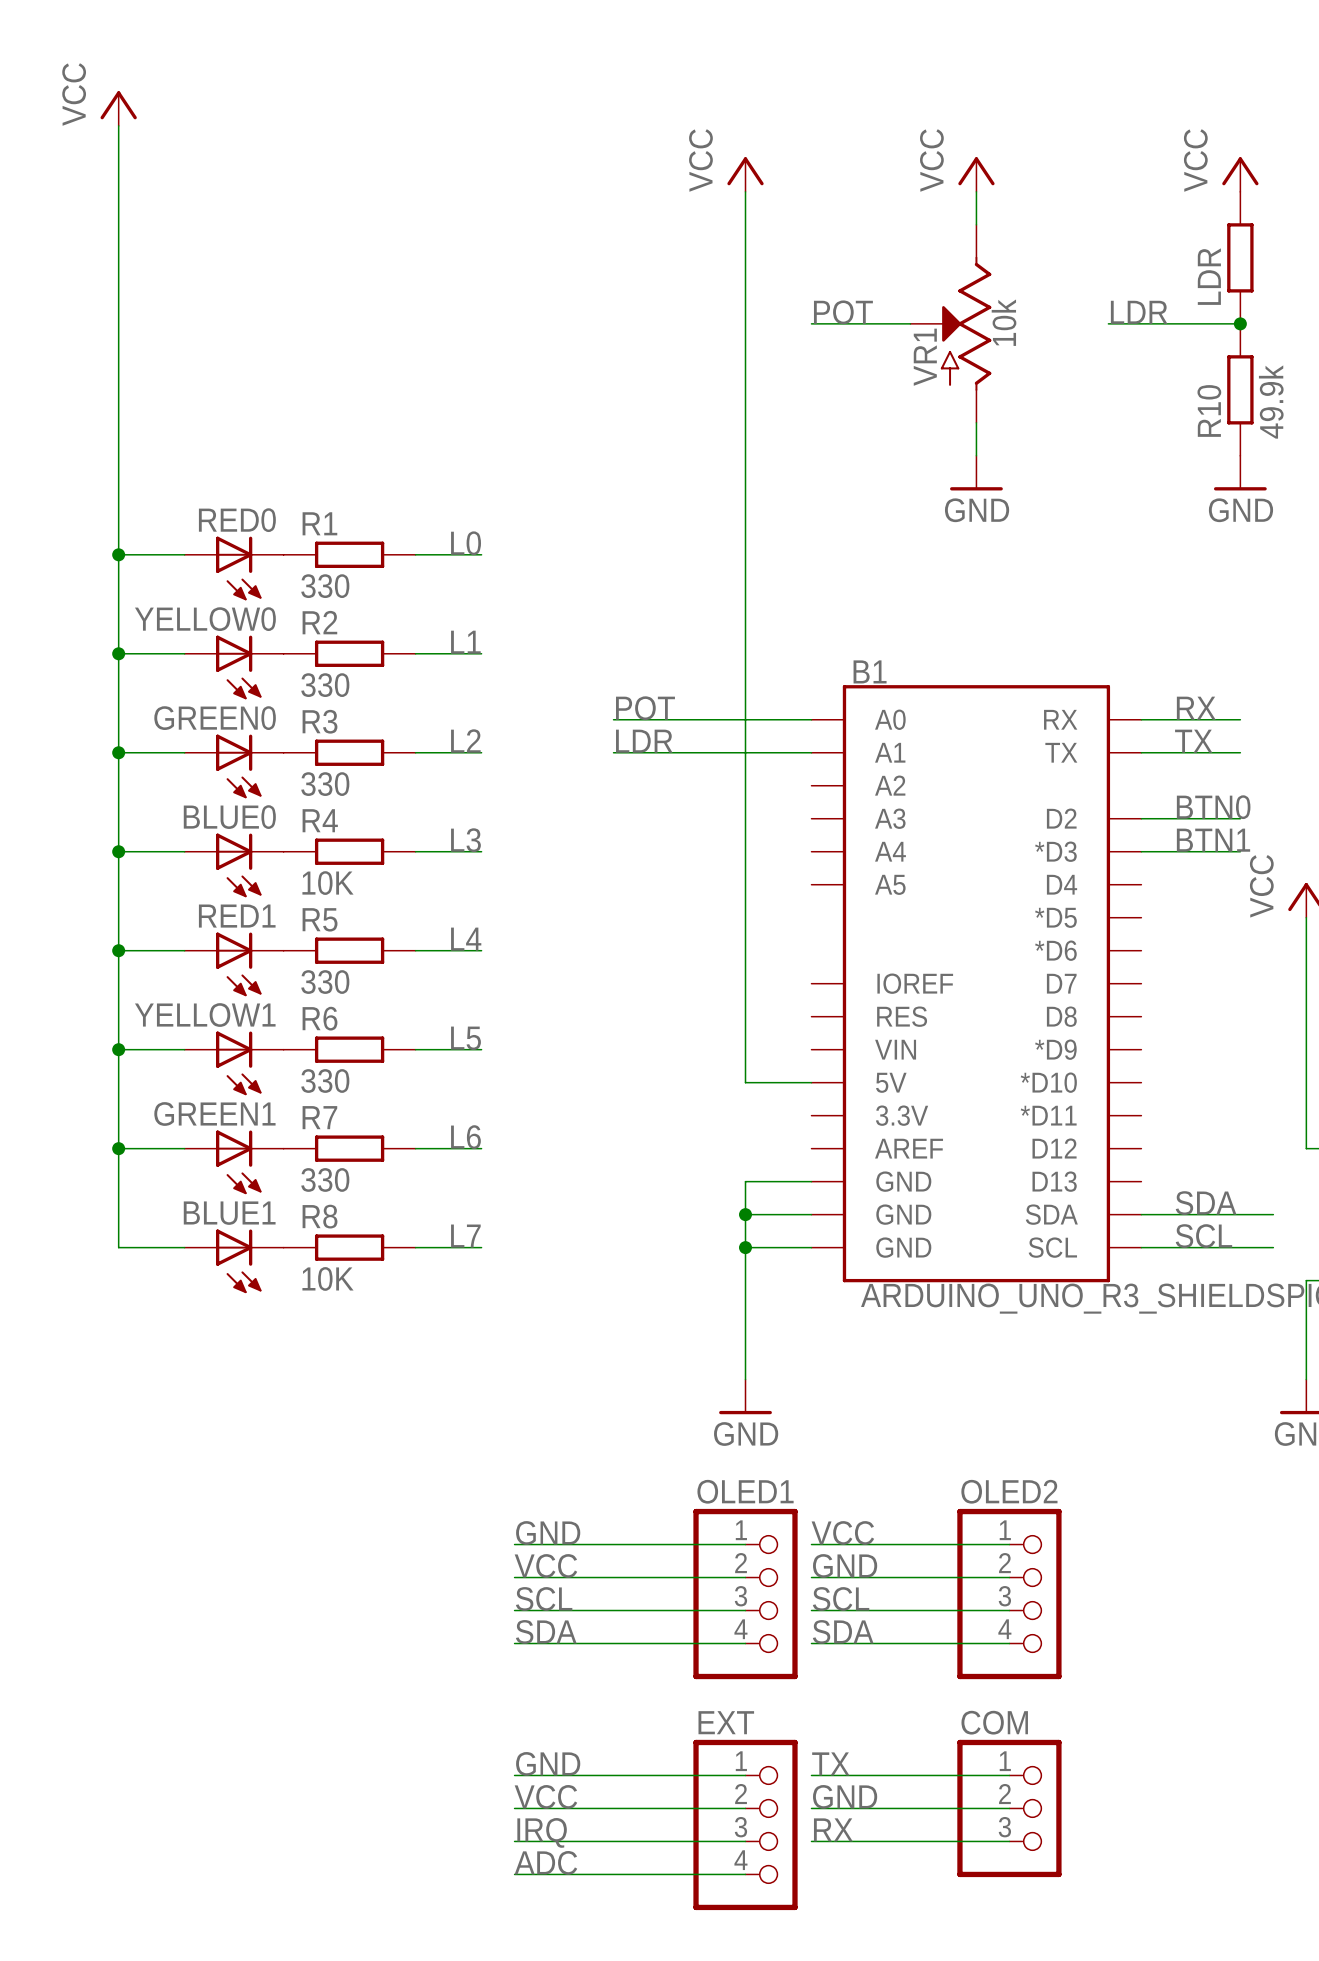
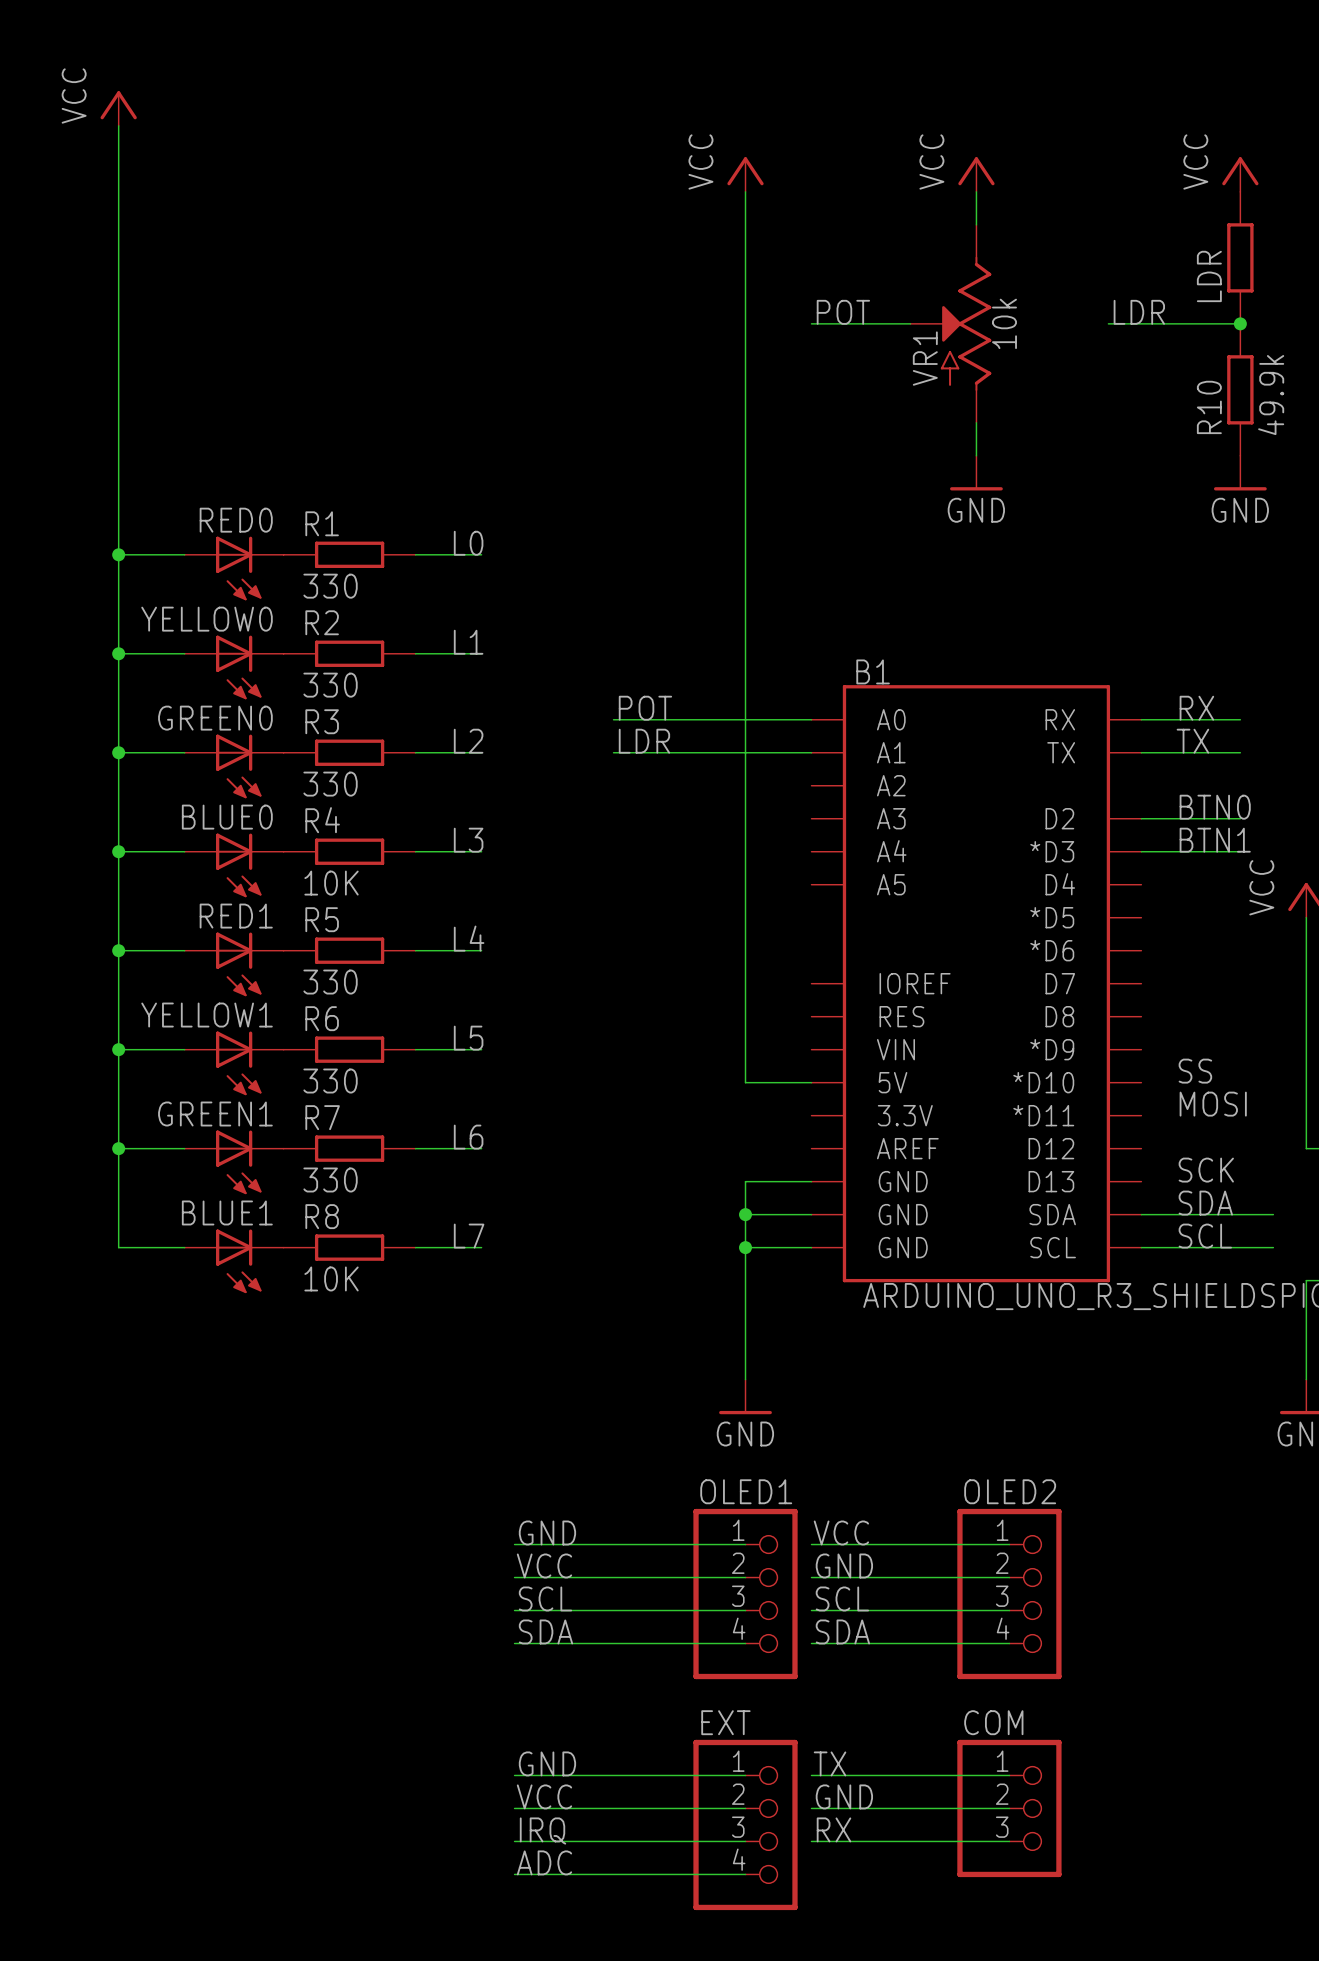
label: none -> SS (1195, 1071)
label: none -> MOSI (1213, 1104)
label: none -> SCK (1206, 1170)

